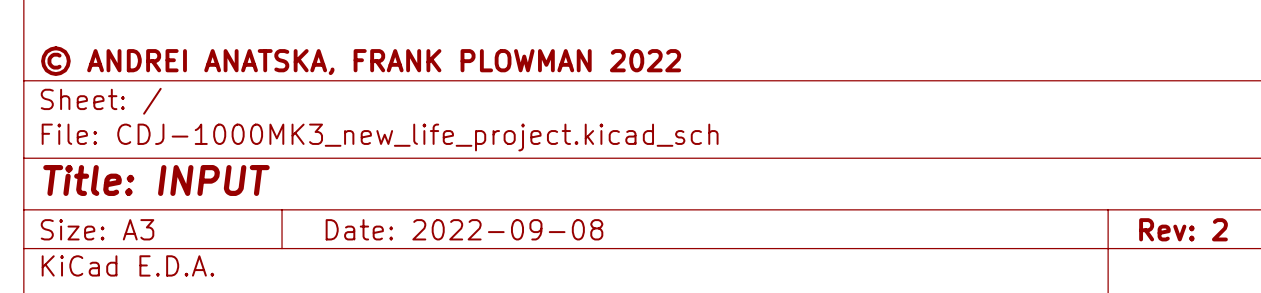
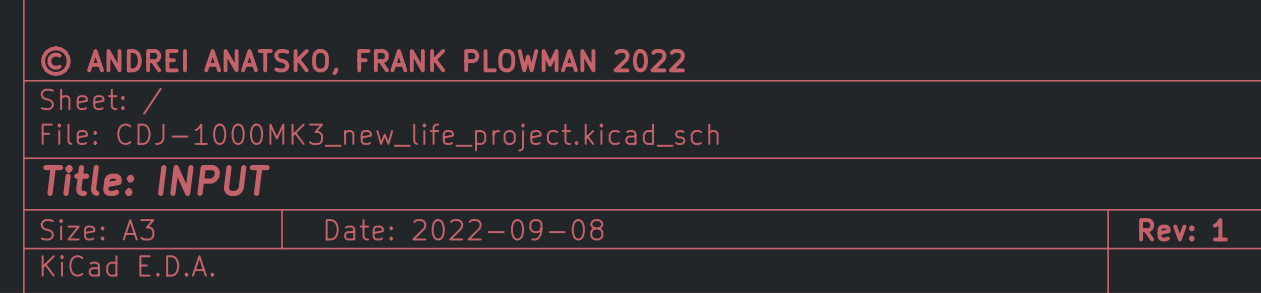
title block: © ANDREI ANATSKA, FRANK PLOWMAN 2022 (361, 61) -> © ANDREI ANATSKO, FRANK PLOWMAN 2022 (362, 61)
title block: Rev: 2 (1183, 229) -> Rev: 1 (1183, 229)

